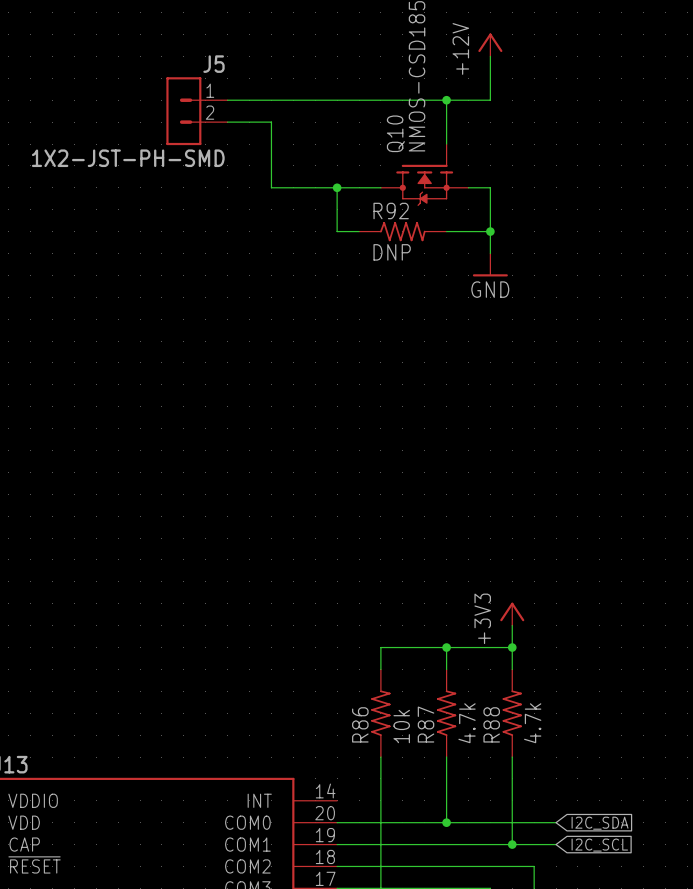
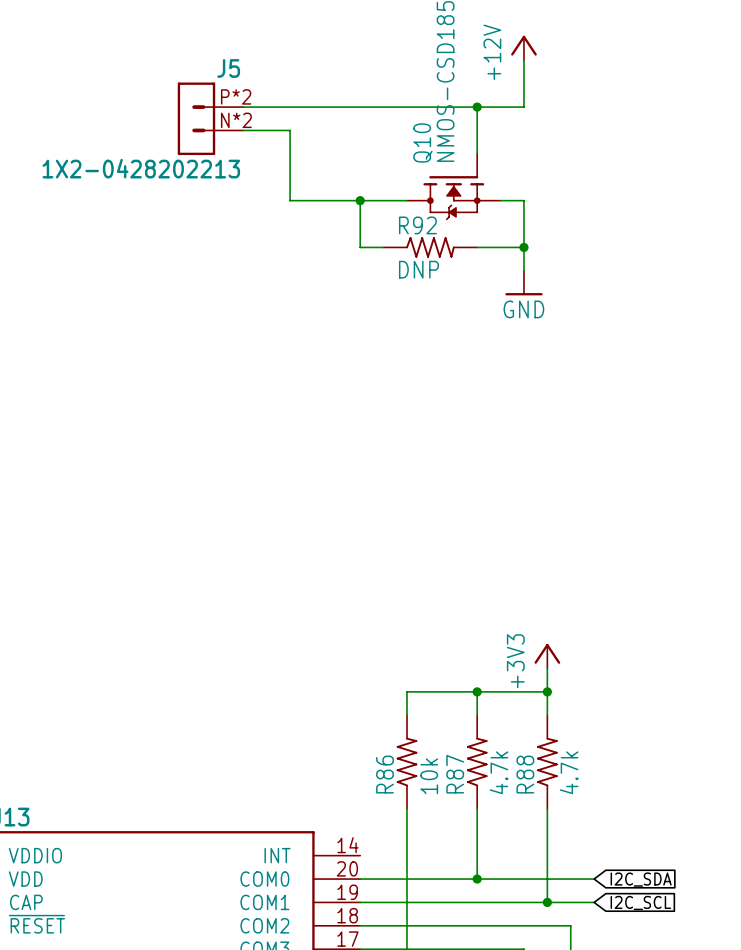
J5 pin number: 1 (210, 90) -> P*2 (236, 96)
J5 pin number: 2 (210, 112) -> N*2 (236, 120)
J5 value: 1X2-JST-PH-SMD (128, 158) -> 1X2-0428202213 (141, 168)

